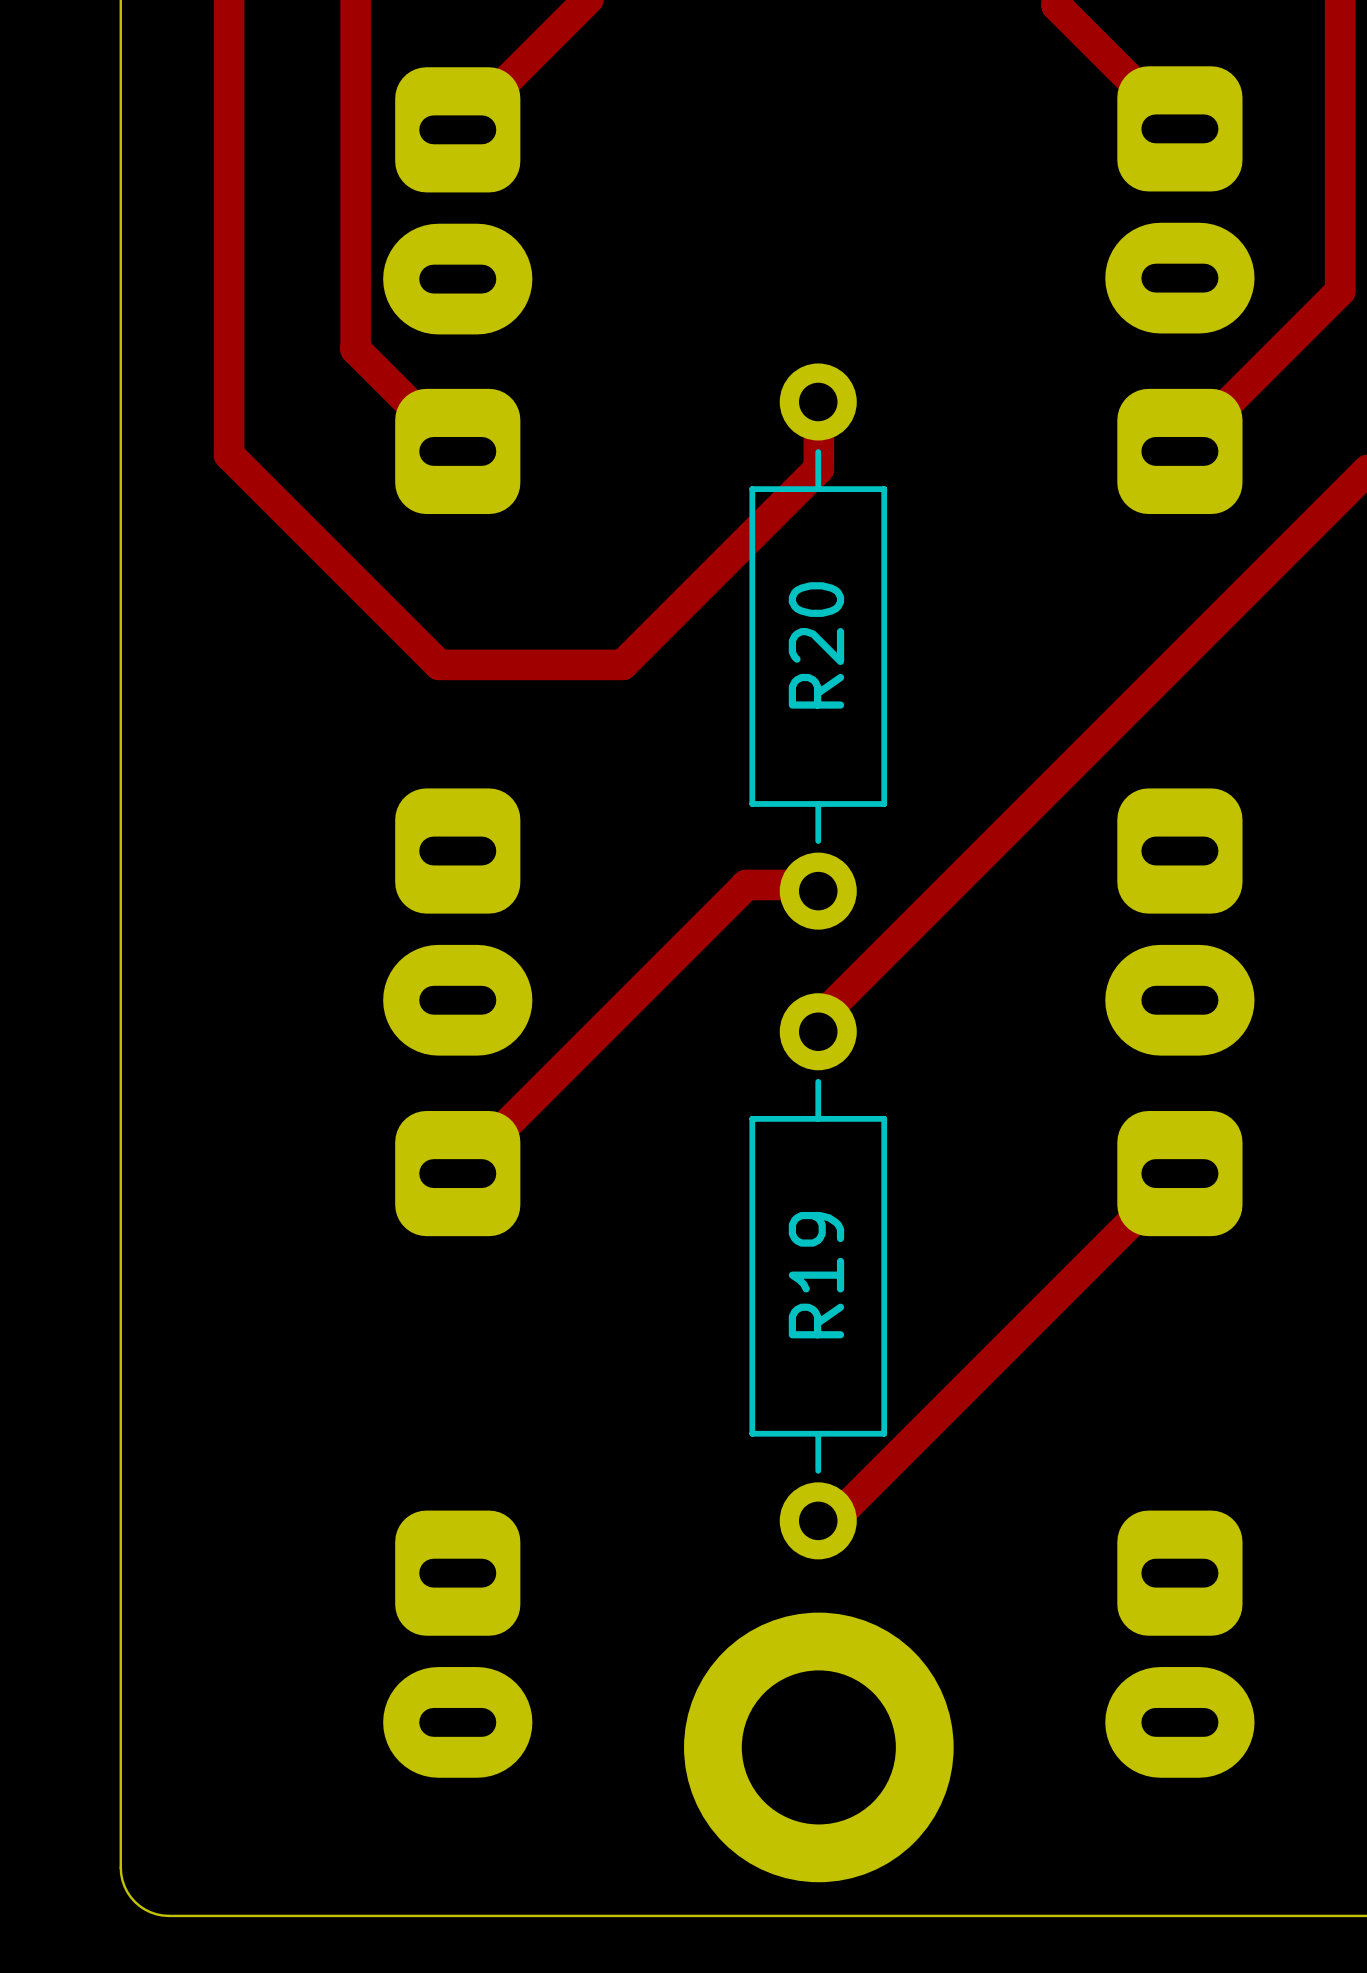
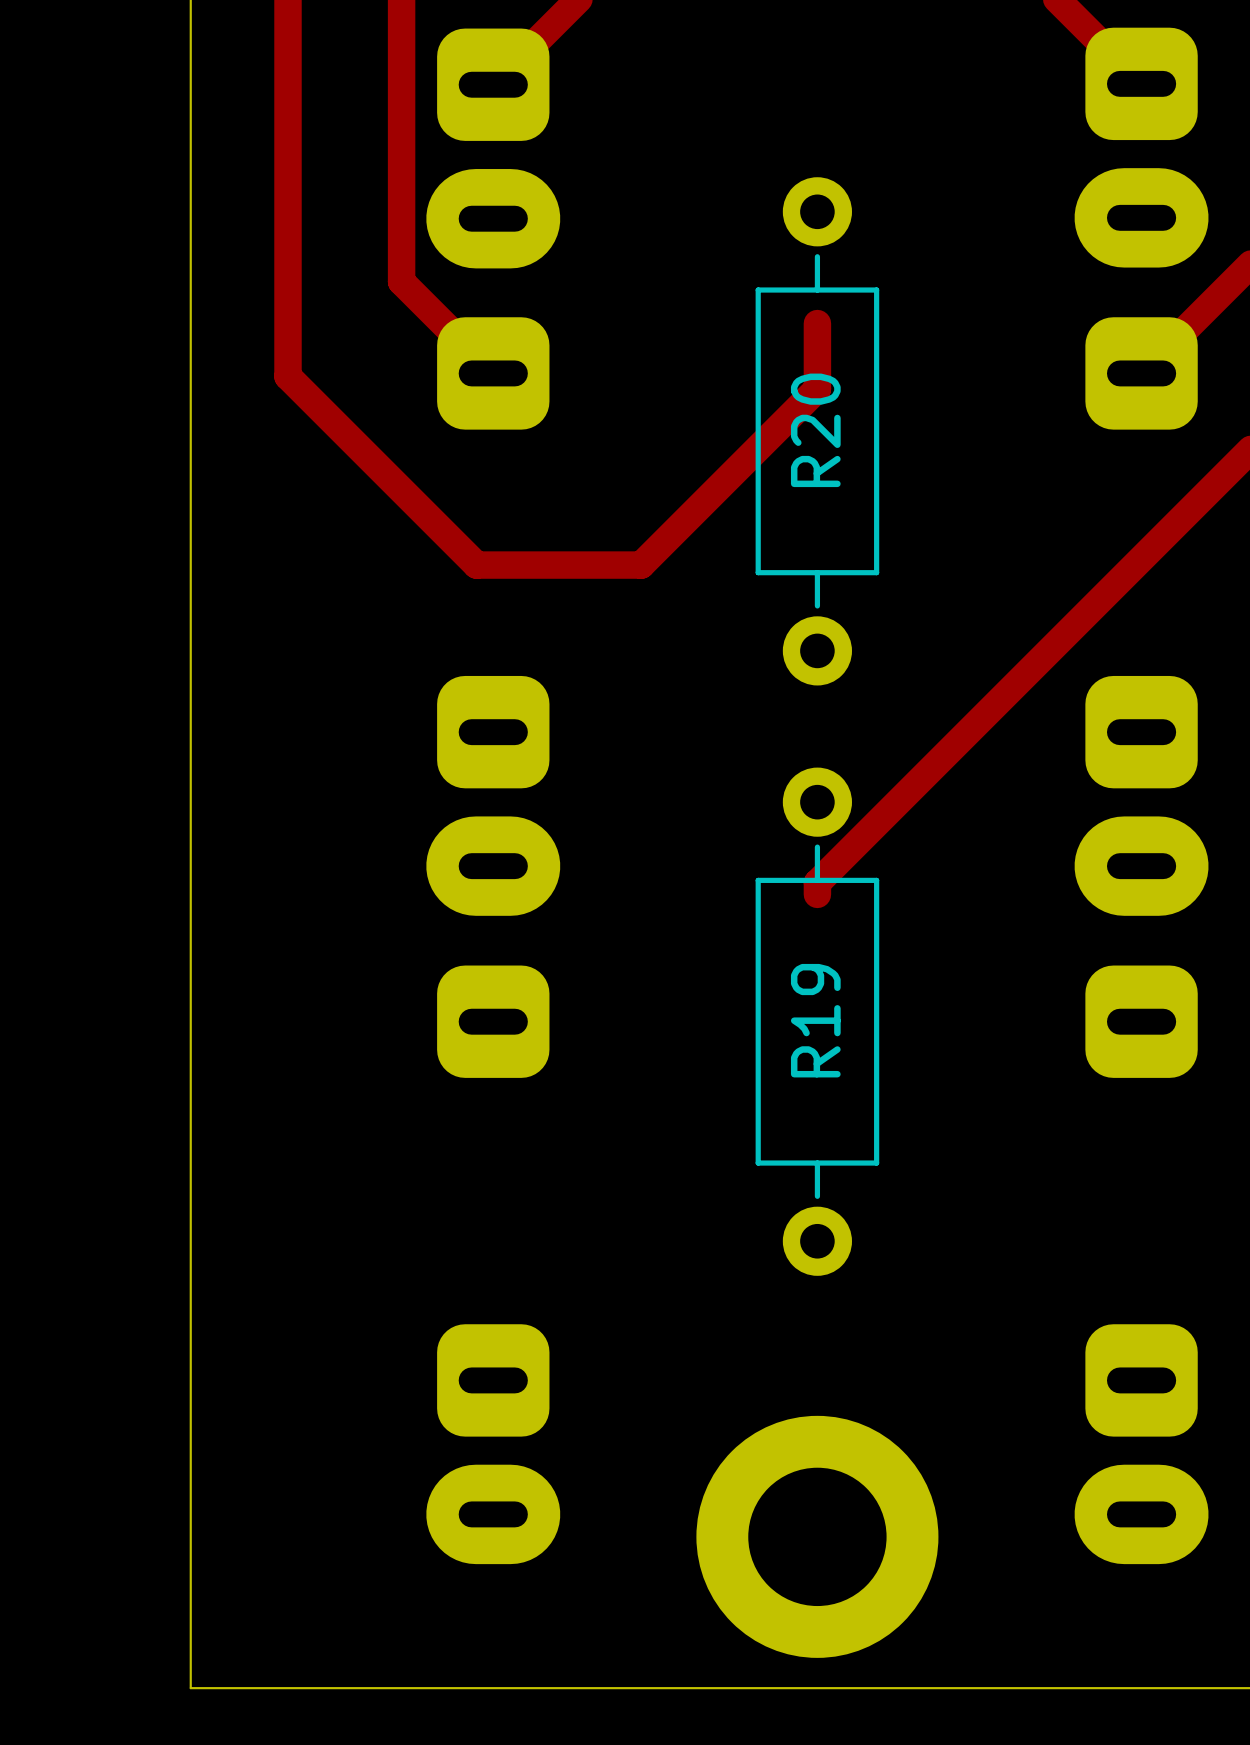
R20 position: (818, 646) -> (817, 431)
top track: (818, 885) (746, 885) (457, 1173) -> none
top track: (1179, 1173) (832, 1520) (818, 1520) -> none
R19 position: (818, 1276) -> (817, 1021)
board edge: (120, 1867) (124, 1886) (134, 1901) (150, 1912) (168, 1915) -> (190, 1644) (190, 1688) (233, 1688)

